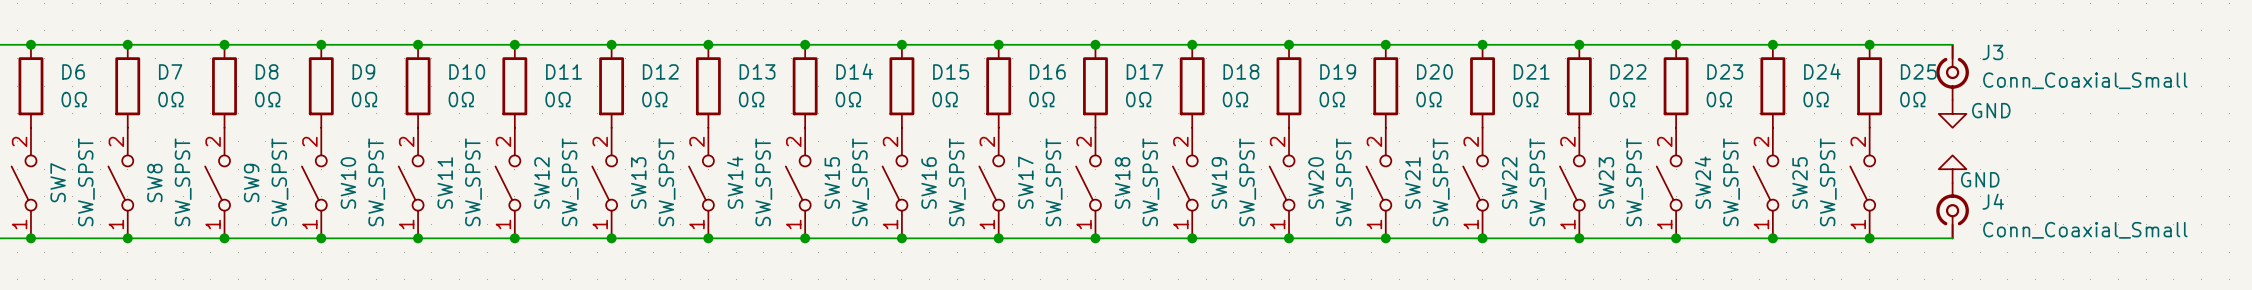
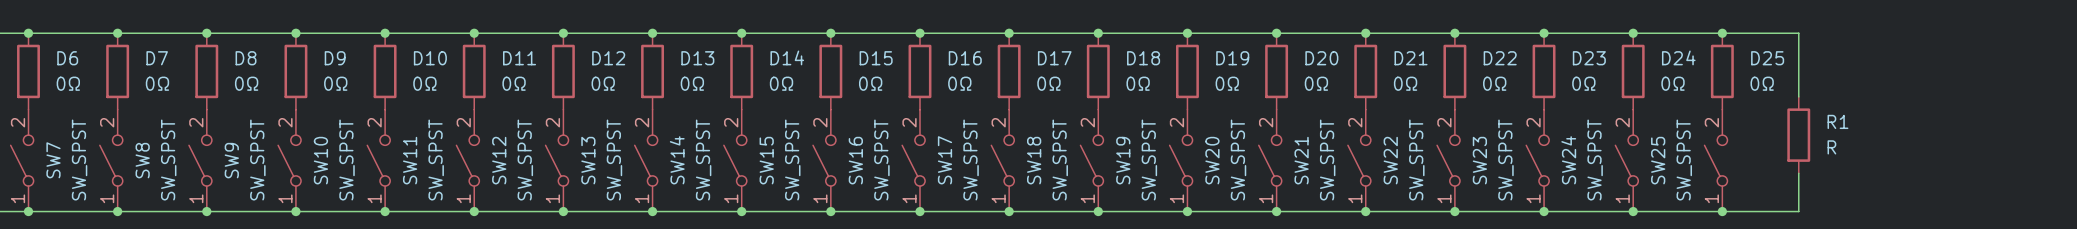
J3: Conn_Coaxial_Small (1952, 72) -> none
power symbol: GND (1952, 113) -> none
R1: none -> R (1798, 135)
power symbol: GND (1952, 169) -> none
J4: Conn_Coaxial_Small (1952, 210) -> none

